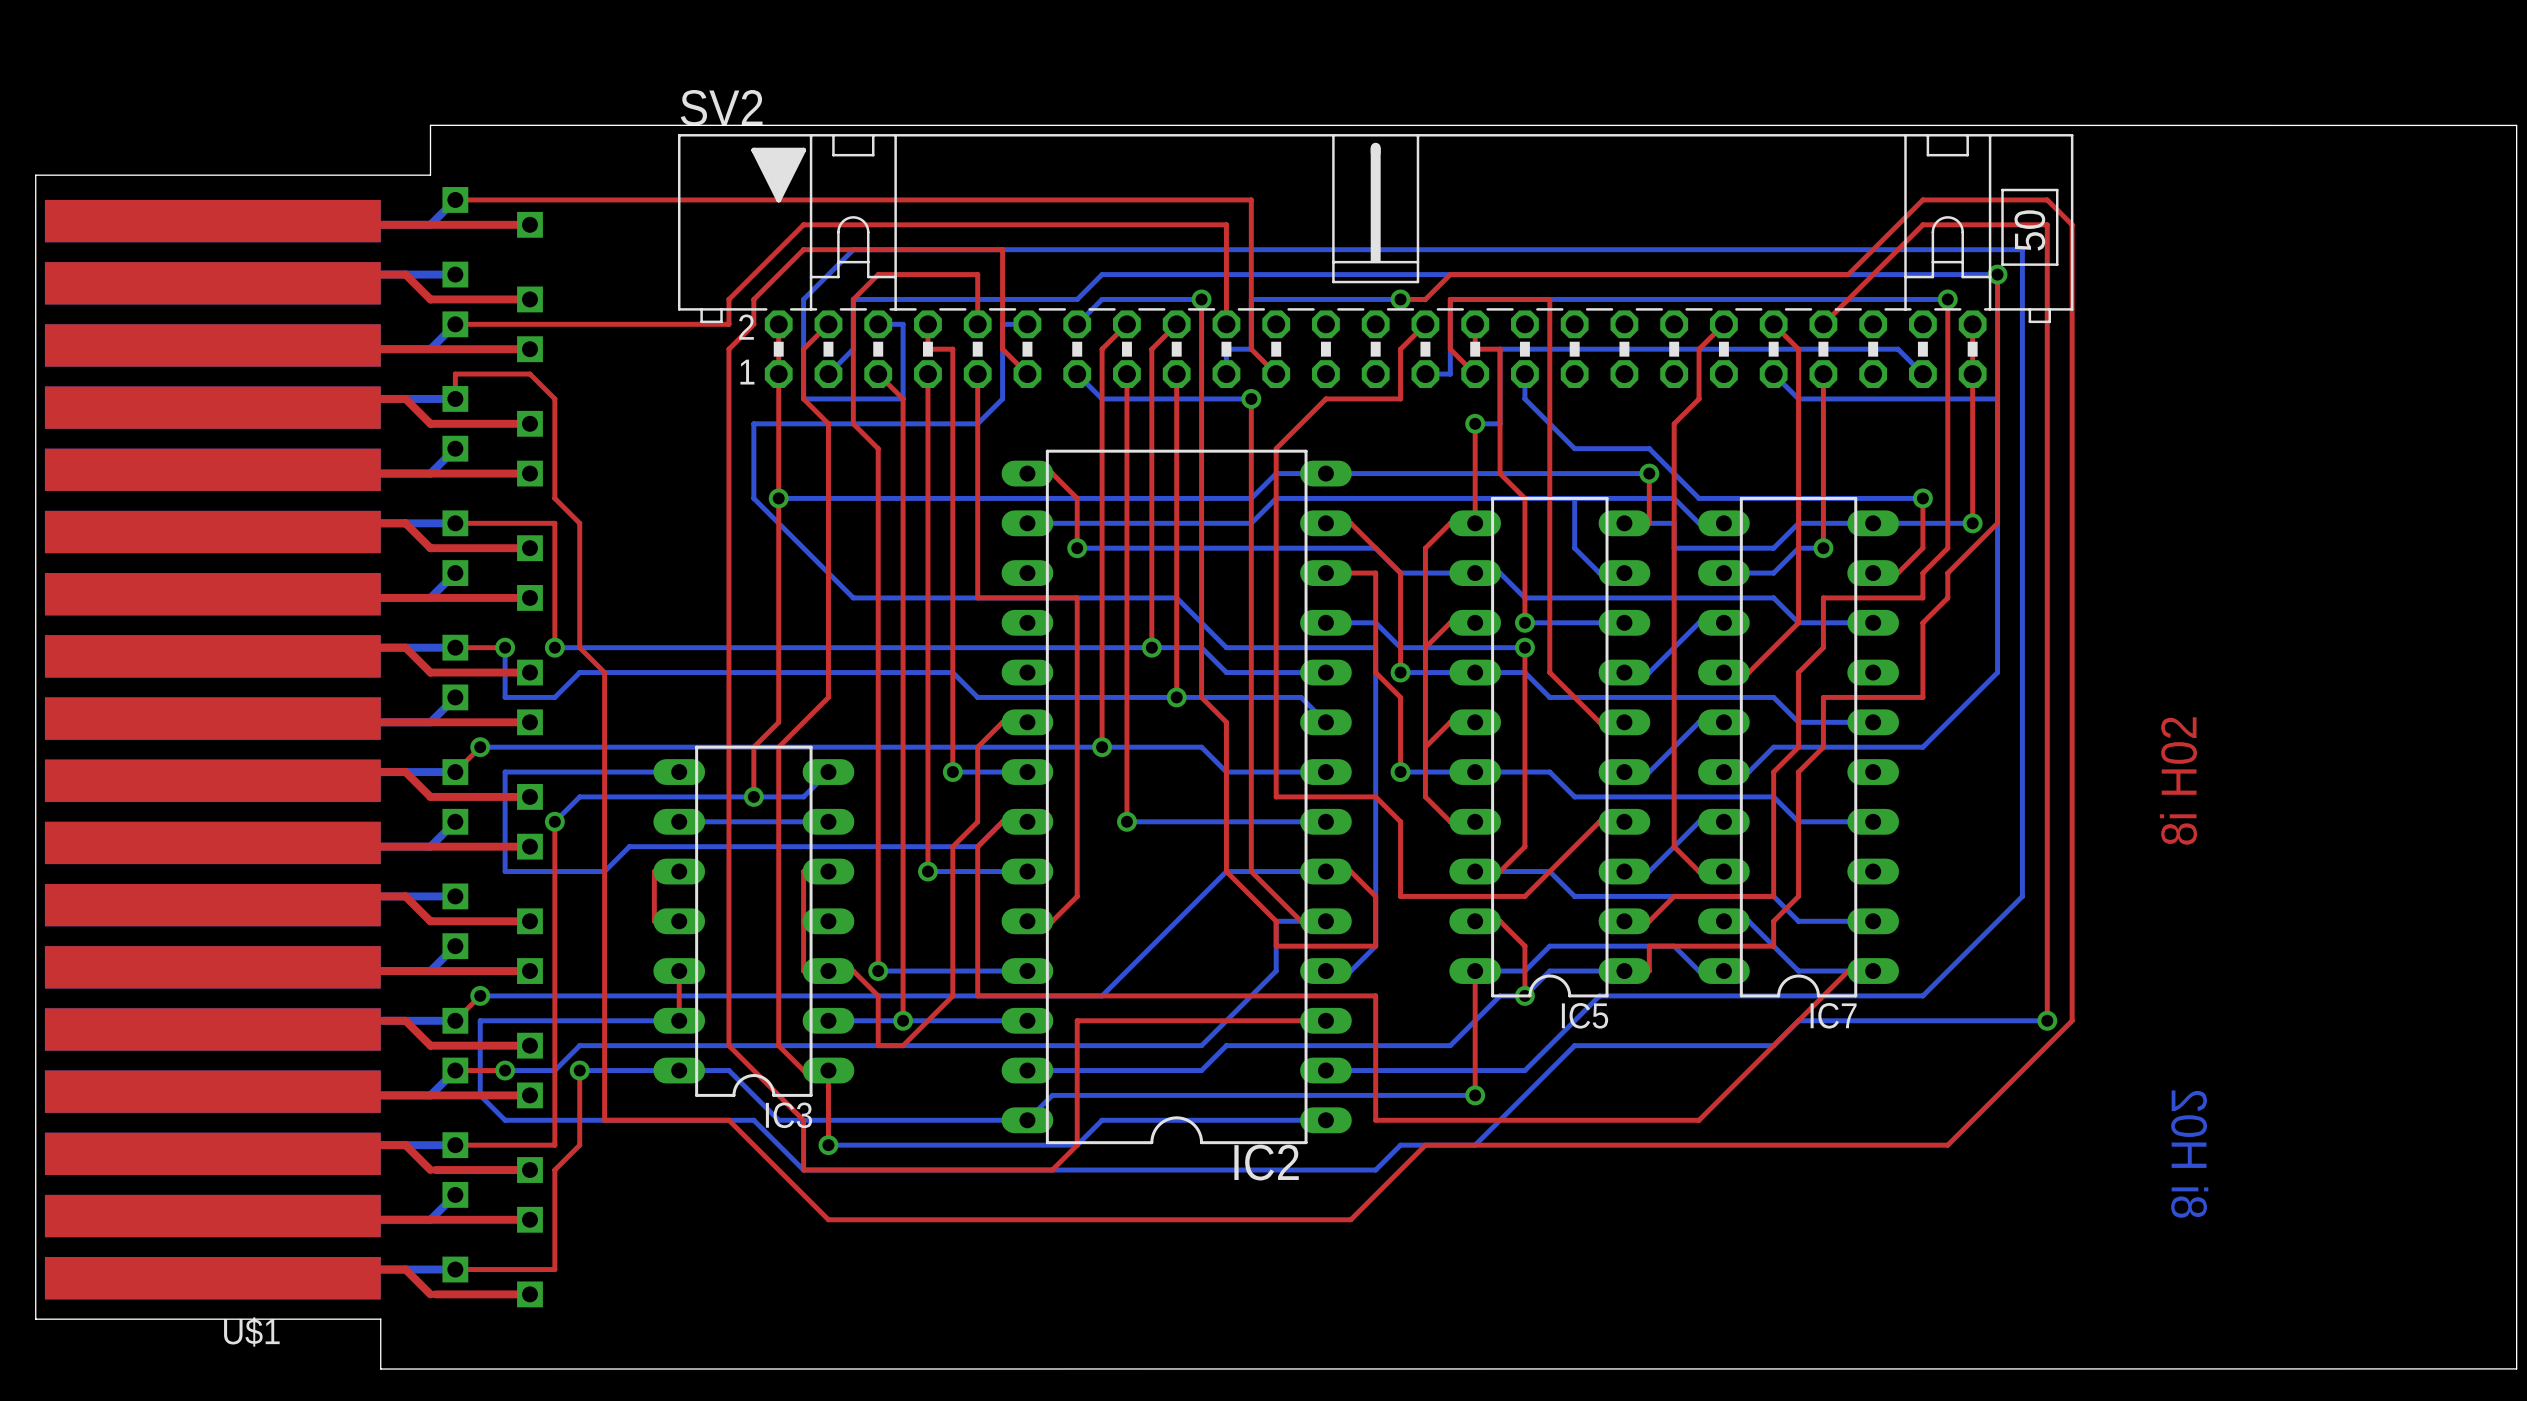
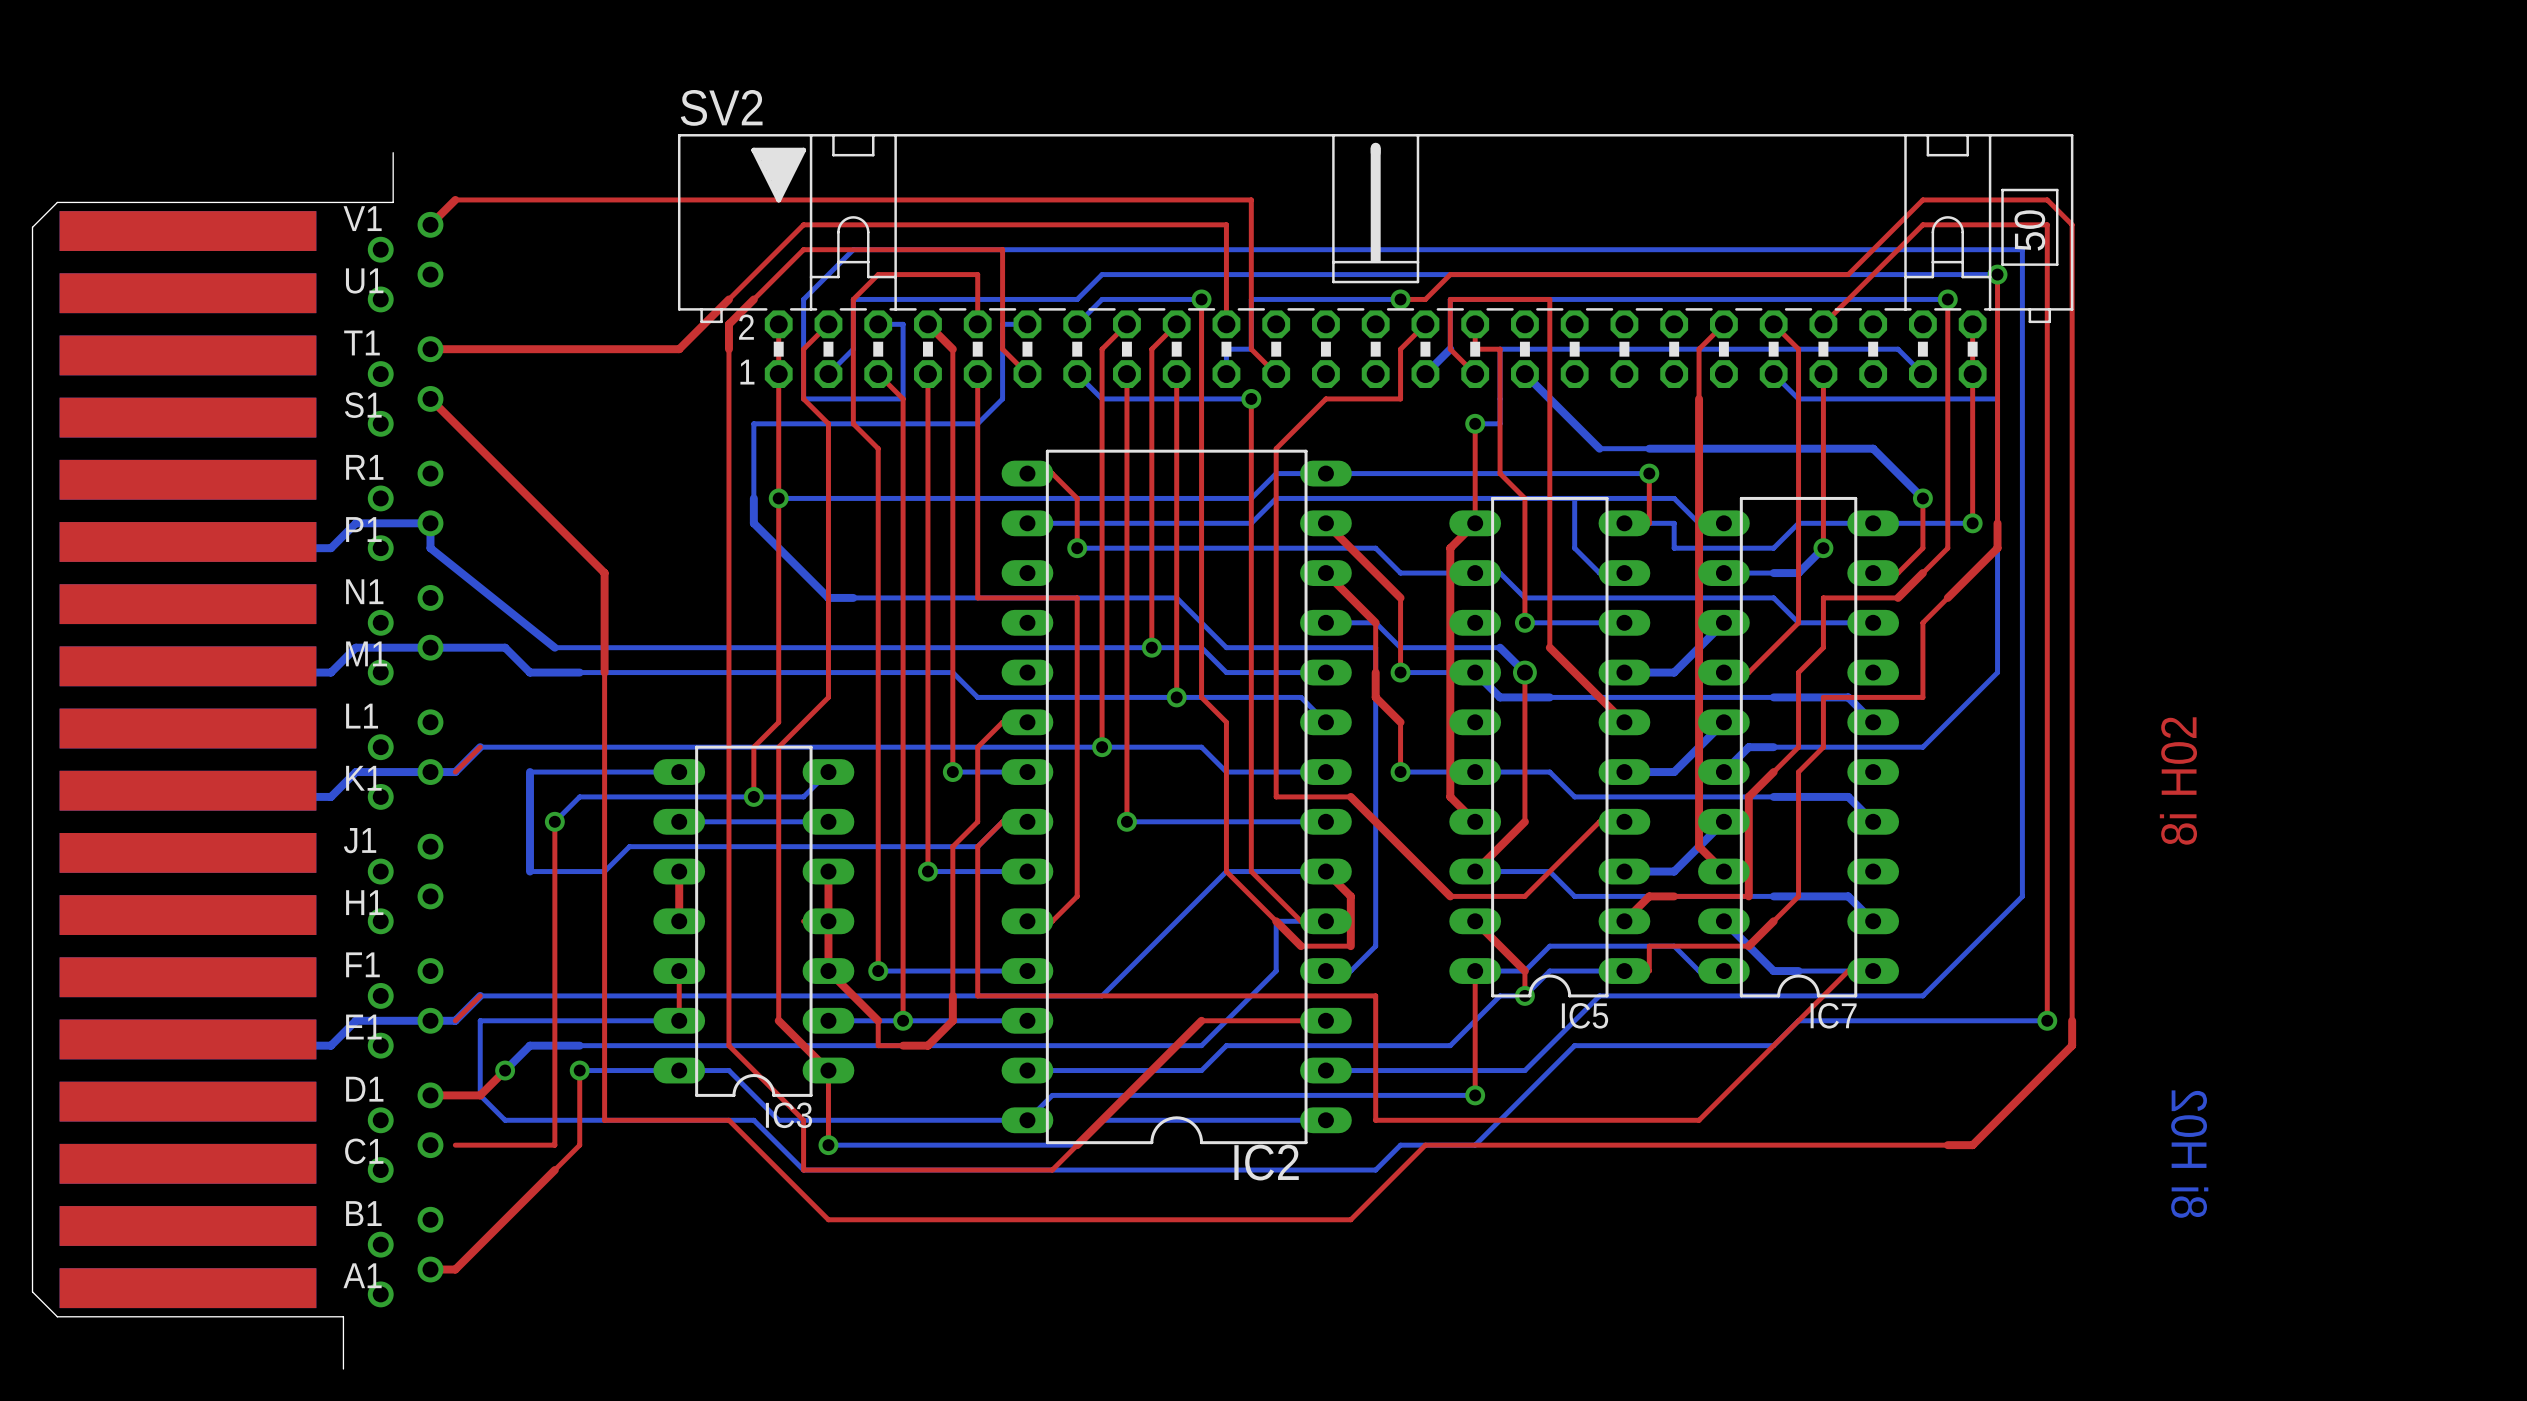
board edge: (430, 125) (2516, 125) (2516, 1368) (380, 1369) (380, 1319) (35, 1319) (35, 175) (430, 175) (430, 125) -> none
top track: none -> (455, 199) (430, 224)
top track: (728, 299) (728, 324) (455, 324) -> (728, 299) (679, 349) (430, 349)
top track: (753, 299) (753, 324) (728, 349) -> (753, 299) (728, 324) (728, 349)
top track: (927, 324) (927, 349) (952, 349) -> (927, 324) (952, 349)
bottom track: (1450, 349) (1450, 374) (1425, 374) -> (1450, 349) (1425, 374)
bottom track: (1524, 374) (1524, 398) (1574, 448) (1599, 448) -> (1524, 374) (1599, 448)
top track: (455, 398) (455, 374) (529, 374) (554, 398) (554, 498) (579, 523) (579, 647) (604, 672) -> (430, 398) (604, 573) (604, 672)
top track: (1699, 398) (1674, 423) (1674, 846) (1699, 871) (1723, 871) -> (1699, 398) (1699, 846) (1723, 871)
bottom track: (1649, 448) (1699, 498) (1922, 498) -> (1649, 448) (1873, 448) (1922, 498)
bottom track: (753, 498) (853, 597) -> (753, 498) (753, 523) (828, 597) (853, 597)
top track: (455, 523) (554, 523) (554, 647) -> none
top track: (1325, 523) (1350, 523) (1400, 573) (1400, 597) -> (1325, 523) (1400, 597)
top track: (1475, 523) (1450, 523) (1425, 548) (1425, 796) (1450, 821) (1475, 821) -> (1475, 523) (1450, 548) (1450, 796) (1475, 821)
top track: (1997, 523) (1947, 573) (1947, 597) -> (1997, 523) (1997, 548) (1947, 597)
bottom track: none -> (187, 541) (194, 548) (330, 548) (355, 523) (430, 523) (430, 548) (554, 647)
bottom track: (1823, 548) (1798, 548) (1773, 573) -> (1823, 548) (1798, 573) (1773, 573)
top track: (1325, 573) (1375, 573) (1375, 622) -> (1325, 573) (1375, 622)
top track: (1922, 573) (1922, 597) (1898, 597) -> (1922, 573) (1898, 597)
top track: (1450, 622) (1425, 647) -> none
bottom track: (1723, 622) (1699, 622) (1649, 672) -> (1723, 622) (1674, 672) (1649, 672)
top track: (455, 647) (505, 647) -> none
bottom track: (505, 647) (505, 697) (554, 697) (579, 672) -> (187, 666) (194, 672) (330, 672) (355, 647) (505, 647) (529, 672) (579, 672)
via: (505, 647) -> none
via: (554, 647) -> none
bottom track: (1500, 647) (1524, 647) -> (1500, 647) (1524, 672)
top track: (1524, 647) (1524, 672) -> none
via: (1524, 647) -> none
top track: (1549, 647) (1549, 672) (1599, 722) (1624, 722) -> (1549, 647) (1624, 722)
top track: (1375, 672) (1400, 697) (1400, 722) -> (1375, 672) (1375, 697) (1400, 722)
bottom track: (1475, 672) (1524, 672) (1549, 697) -> (1475, 672) (1500, 697) (1549, 697)
via: none -> (1524, 672)
bottom track: (1773, 697) (1798, 722) (1873, 722) -> (1773, 697) (1848, 697) (1873, 722)
top track: (1450, 722) (1425, 747) -> none
bottom track: (1723, 722) (1699, 722) (1649, 772) -> (1723, 722) (1674, 772) (1649, 772)
U$1: (293, 747) -> none
bottom track: none -> (480, 747) (455, 772) (355, 772) (330, 796) (194, 796) (187, 790)
via: (480, 747) -> none
bottom track: (1773, 747) (1748, 772) (1723, 772) -> (1773, 747) (1748, 747) (1723, 772)
part: none -> (405, 759)
part: none -> (212, 760)
bottom track: (529, 772) (505, 772) (505, 871) (529, 871) -> (529, 772) (529, 871)
top track: (1773, 772) (1773, 896) (1748, 896) -> (1773, 772) (1748, 796) (1748, 896)
top track: (1350, 796) (1375, 796) (1400, 821) (1400, 896) (1450, 896) -> (1350, 796) (1450, 896)
bottom track: (1773, 796) (1798, 821) (1873, 821) -> (1773, 796) (1848, 796) (1873, 821)
top track: (1524, 821) (1524, 846) (1500, 871) (1475, 871) -> (1524, 821) (1475, 871)
bottom track: (1723, 821) (1699, 821) (1649, 871) -> (1723, 821) (1674, 871) (1649, 871)
top track: (679, 871) (654, 871) (654, 921) (679, 921) -> (679, 871) (679, 921)
top track: (828, 871) (803, 871) (803, 971) (853, 971) (878, 995) (878, 1020) -> (828, 871) (828, 971) (878, 1020)
top track: (1325, 871) (1350, 871) (1375, 896) (1375, 946) (1350, 946) -> (1325, 871) (1350, 896) (1350, 946)
top track: (1674, 896) (1649, 921) (1624, 921) -> (1674, 896) (1649, 896) (1624, 921)
bottom track: (1773, 896) (1798, 921) (1873, 921) -> (1773, 896) (1848, 896) (1873, 921)
top track: (1276, 921) (1276, 946) (1301, 946) -> (1276, 921) (1301, 946)
top track: (1475, 921) (1500, 921) (1524, 946) (1524, 971) -> (1475, 921) (1524, 971)
bottom track: (1723, 921) (1748, 921) (1798, 971) -> (1723, 921) (1773, 971) (1798, 971)
top track: (1773, 921) (1773, 946) (1748, 946) -> (1773, 921) (1748, 946)
bottom track: none -> (480, 995) (455, 1020) (355, 1020) (330, 1045) (194, 1045) (187, 1039)
via: (480, 995) -> none
top track: (952, 995) (903, 1045) -> (952, 995) (952, 1020) (927, 1045) (903, 1045)
top track: (778, 1020) (778, 1045) (803, 1070) (828, 1070) -> (778, 1020) (828, 1070)
top track: (1201, 1020) (1077, 1020) (1077, 1145) -> (1201, 1020) (1077, 1145)
top track: (2072, 1020) (1947, 1145) -> (2072, 1020) (2072, 1045) (1972, 1145) (1947, 1145)
bottom track: (579, 1045) (554, 1070) (505, 1070) -> (579, 1045) (529, 1045) (505, 1070)
top track: (455, 1070) (505, 1070) -> (430, 1095) (480, 1095) (505, 1070)
top track: (554, 1170) (554, 1269) (455, 1269) -> (554, 1170) (455, 1269) (430, 1269)

